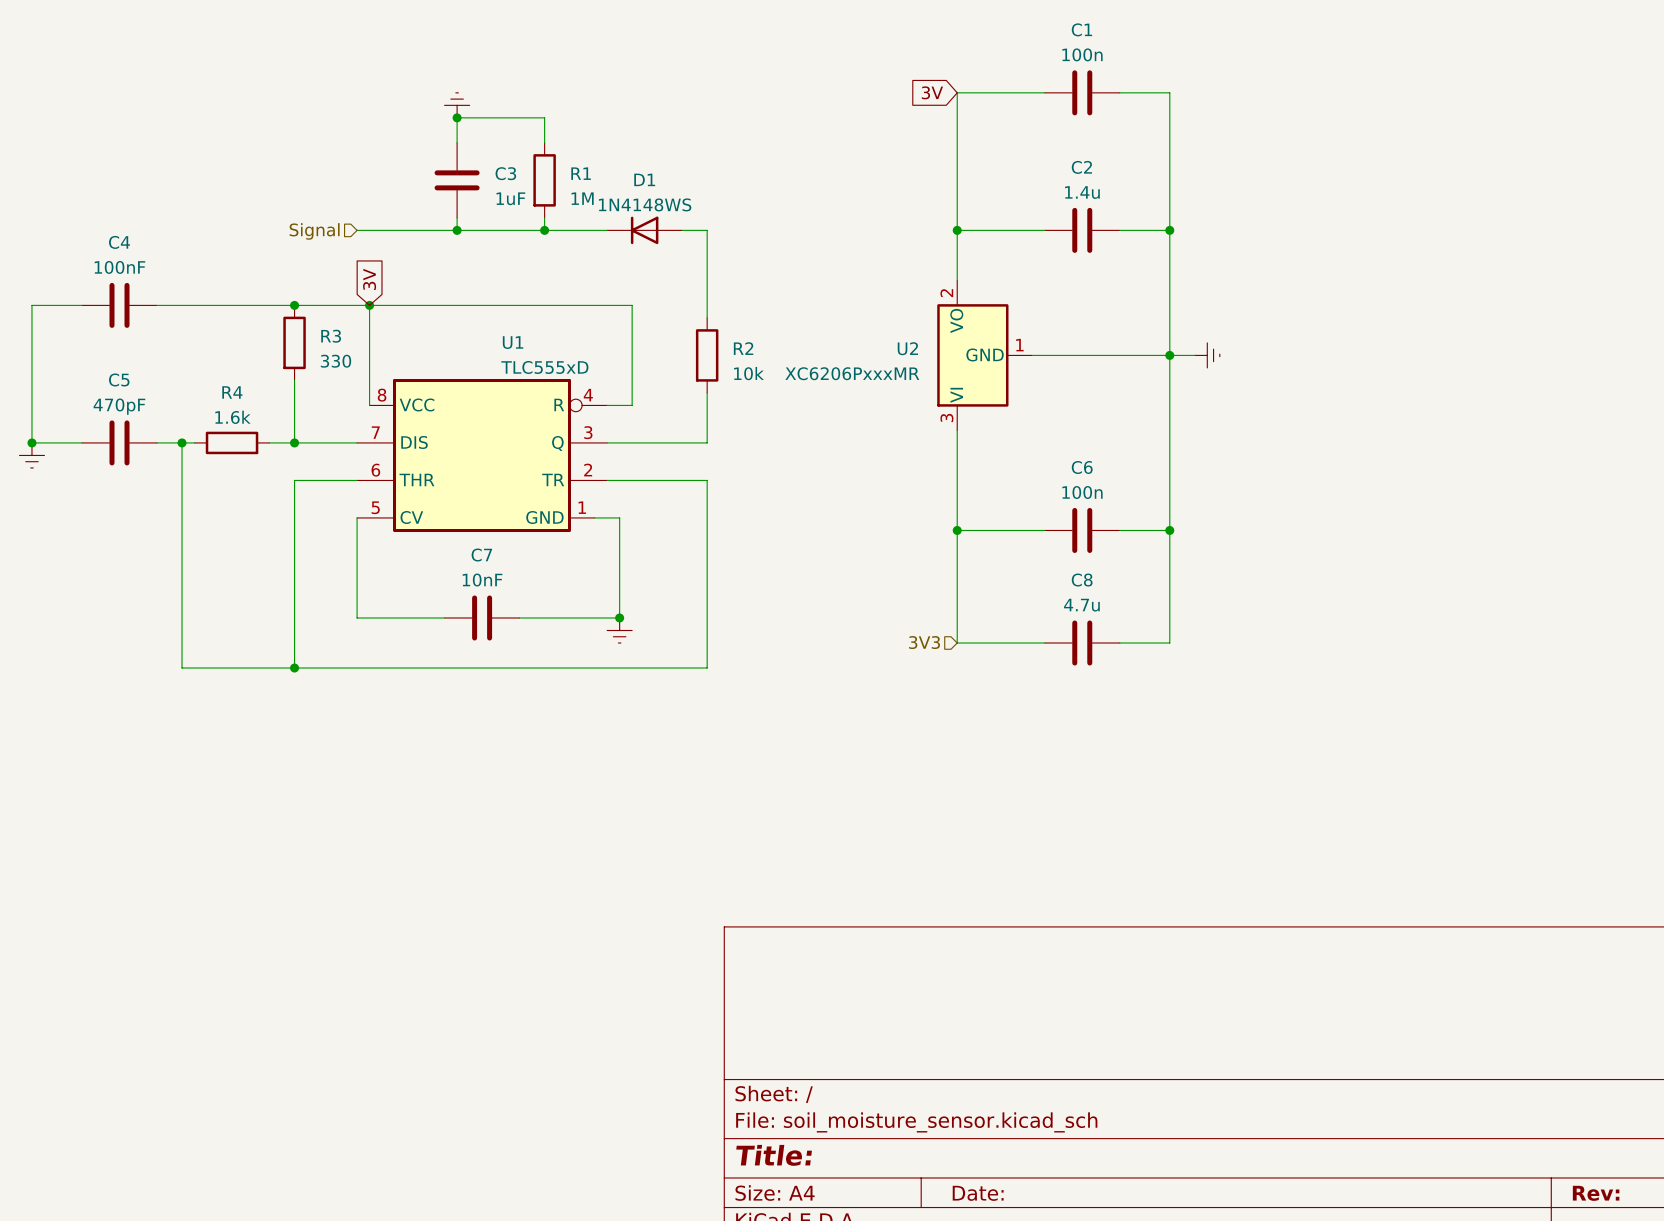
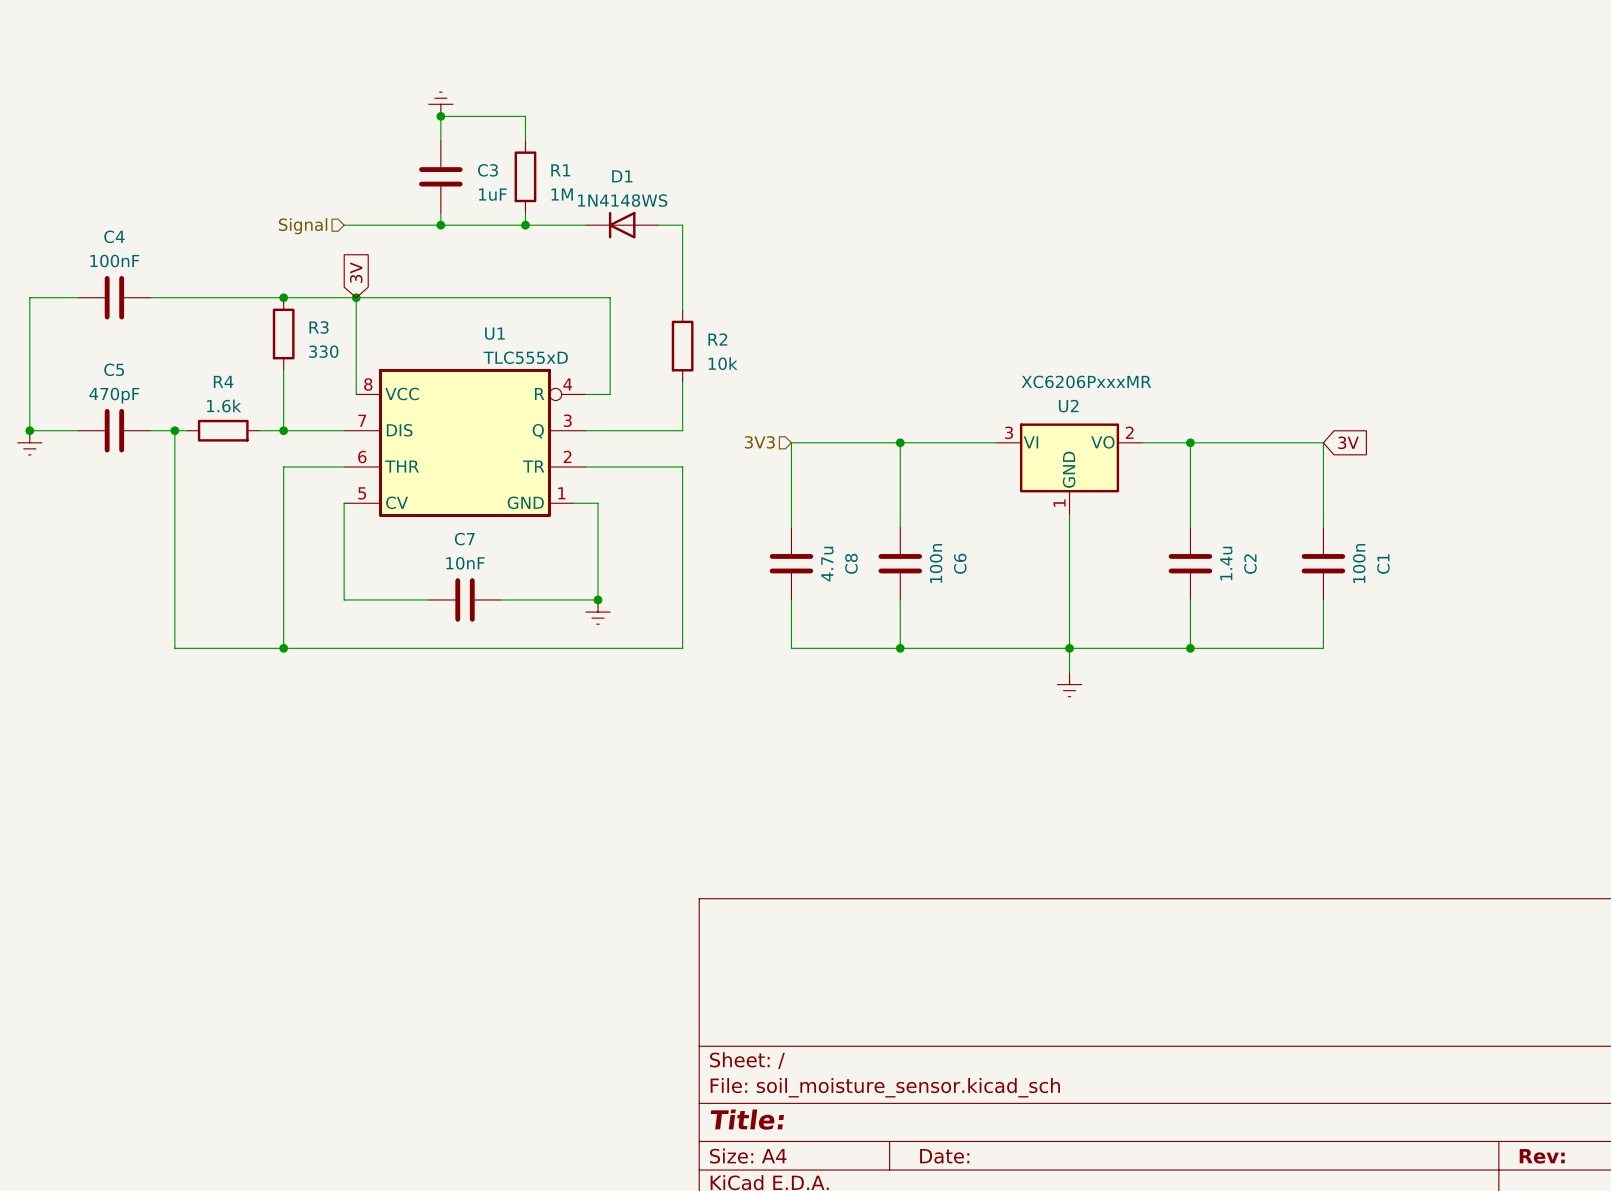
global label: 3V (932, 92) -> none
wire: (1044, 92) (957, 92) (957, 280) -> none
C1 rotation: 0° (1082, 92) -> 90° clockwise (1323, 563)
C1 position: (1082, 92) -> (1323, 563)
wire: (1119, 92) (1169, 92) (1169, 643) (1119, 643) -> none
wire: (957, 230) (1044, 230) -> none
junction: (957, 230) -> none
C2 rotation: 0° (1082, 230) -> 90° clockwise (1190, 563)
C2 position: (1082, 230) -> (1190, 563)
wire: (1119, 230) (1169, 230) -> none
junction: (1169, 230) -> none
U2 rotation: 0° (972, 355) -> 90° clockwise (1069, 457)
U2 position: (984, 355) -> (1069, 469)
wire: (1032, 355) (1194, 355) -> none
junction: (1169, 355) -> none
power symbol: (1207, 355) -> none
U2 value position: XC6206PxxxMR (852, 373) -> XC6206PxxxMR (1086, 381)
wire: (957, 430) (957, 643) (1044, 643) -> none
wire: none -> (900, 442) (900, 527)
junction: none -> (900, 442)
wire: none -> (996, 442) (791, 442) (791, 527)
wire: none -> (1142, 442) (1323, 442) (1323, 527)
wire: none -> (1190, 442) (1190, 527)
junction: none -> (1190, 442)
global label: none -> 3V (1348, 442)
wire: (957, 530) (1044, 530) -> none
junction: (957, 530) -> none
C6 rotation: 0° (1082, 530) -> 90° clockwise (900, 563)
C6 position: (1082, 530) -> (900, 563)
wire: none -> (1069, 515) (1069, 672)
wire: (1119, 530) (1169, 530) -> none
junction: (1169, 530) -> none
wire: none -> (791, 599) (791, 648) (1323, 648) (1323, 599)
wire: none -> (900, 599) (900, 648)
wire: none -> (1190, 599) (1190, 648)
hierarchical label position: 3V3 (924, 642) -> 3V3 (759, 442)
C8 rotation: 0° (1082, 643) -> 90° clockwise (791, 563)
C8 position: (1082, 643) -> (791, 563)
junction: none -> (900, 648)
junction: none -> (1069, 648)
junction: none -> (1190, 648)
power symbol: none -> (1069, 684)

